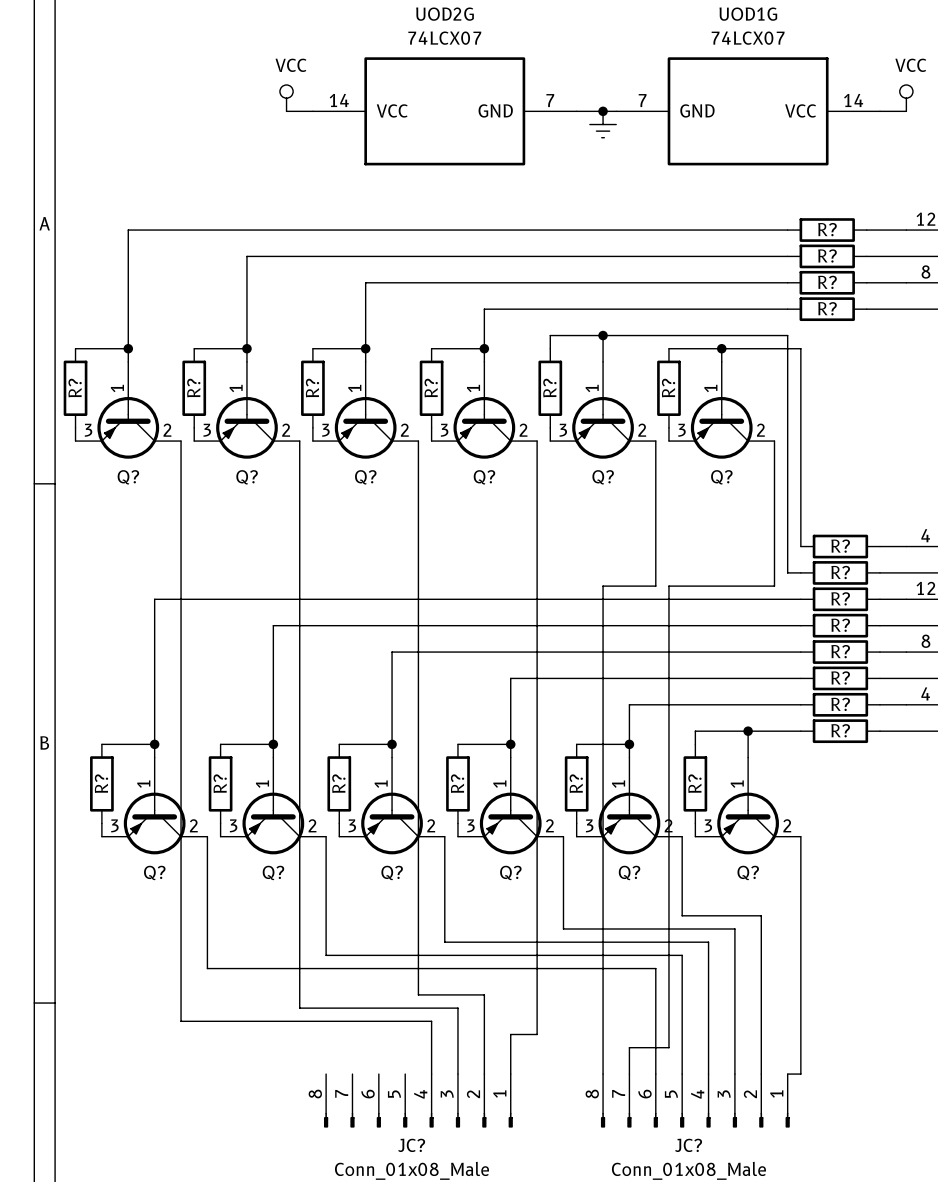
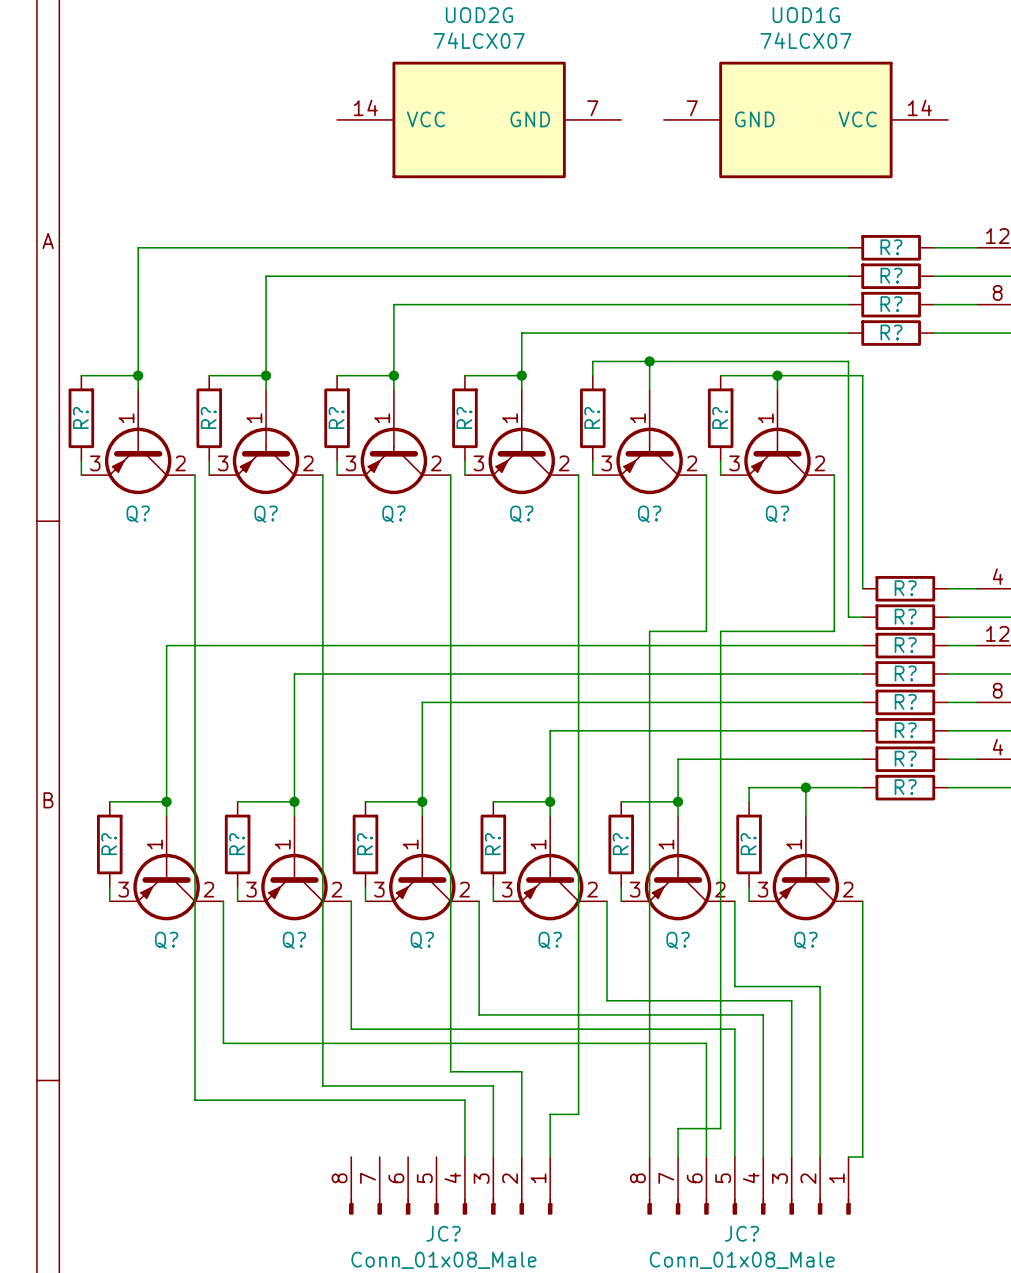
power symbol: VCC (286, 98) -> none
power symbol: VCC (906, 98) -> none
wire: (286, 111) (312, 111) -> none
wire: (576, 111) (616, 111) -> none
junction: (603, 111) -> none
wire: (879, 111) (906, 111) -> none
power symbol: (603, 124) -> none

